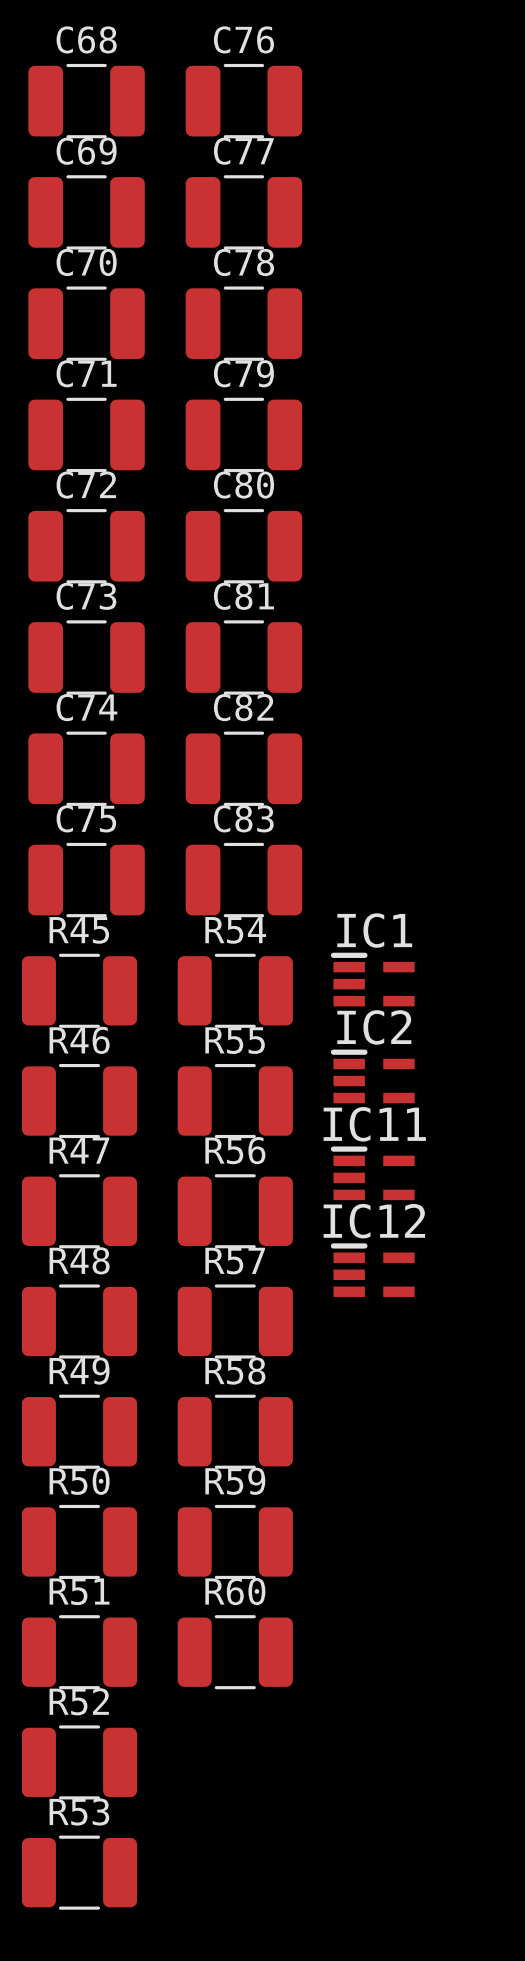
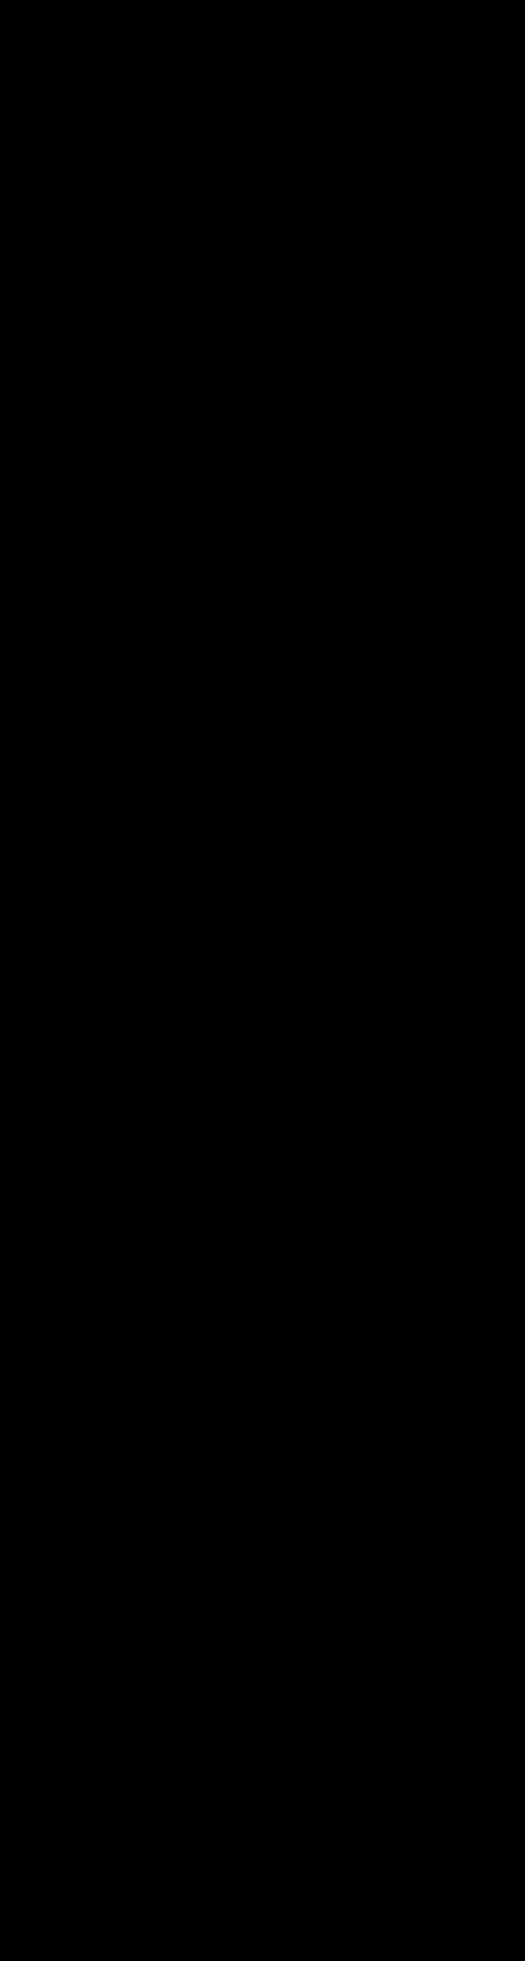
C68: (86, 101) -> none
C76: (243, 101) -> none
C69: (86, 212) -> none
C77: (243, 212) -> none
C70: (86, 323) -> none
C78: (243, 323) -> none
C71: (86, 434) -> none
C79: (243, 434) -> none
C72: (86, 546) -> none
C80: (243, 546) -> none
C73: (86, 657) -> none
C81: (243, 657) -> none
C74: (86, 768) -> none
C82: (243, 768) -> none
C75: (86, 880) -> none
C83: (243, 880) -> none
IC1: (372, 979) -> none
R45: (79, 990) -> none
R54: (235, 990) -> none
IC2: (372, 1076) -> none
R46: (79, 1101) -> none
R55: (235, 1101) -> none
IC11: (372, 1173) -> none
R47: (79, 1211) -> none
R56: (235, 1211) -> none
IC12: (372, 1270) -> none
R48: (79, 1321) -> none
R57: (235, 1321) -> none
R49: (79, 1431) -> none
R58: (235, 1431) -> none
R50: (79, 1541) -> none
R59: (235, 1541) -> none
R51: (79, 1652) -> none
R60: (235, 1652) -> none
R52: (79, 1762) -> none
R53: (79, 1872) -> none

